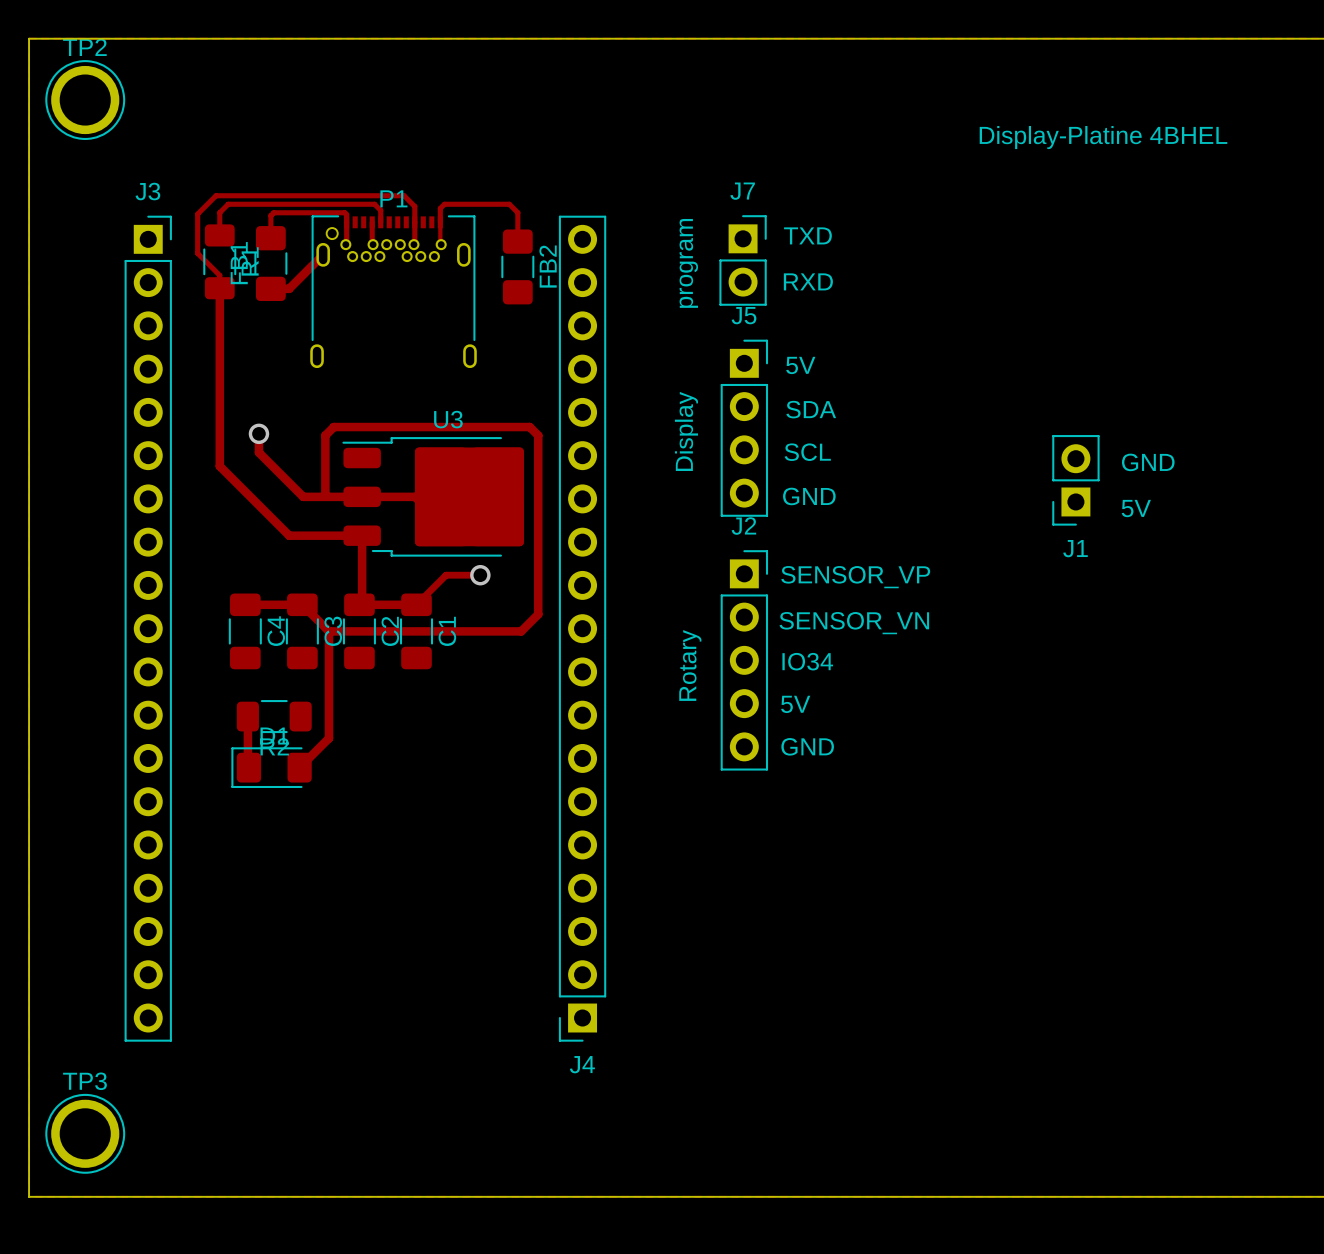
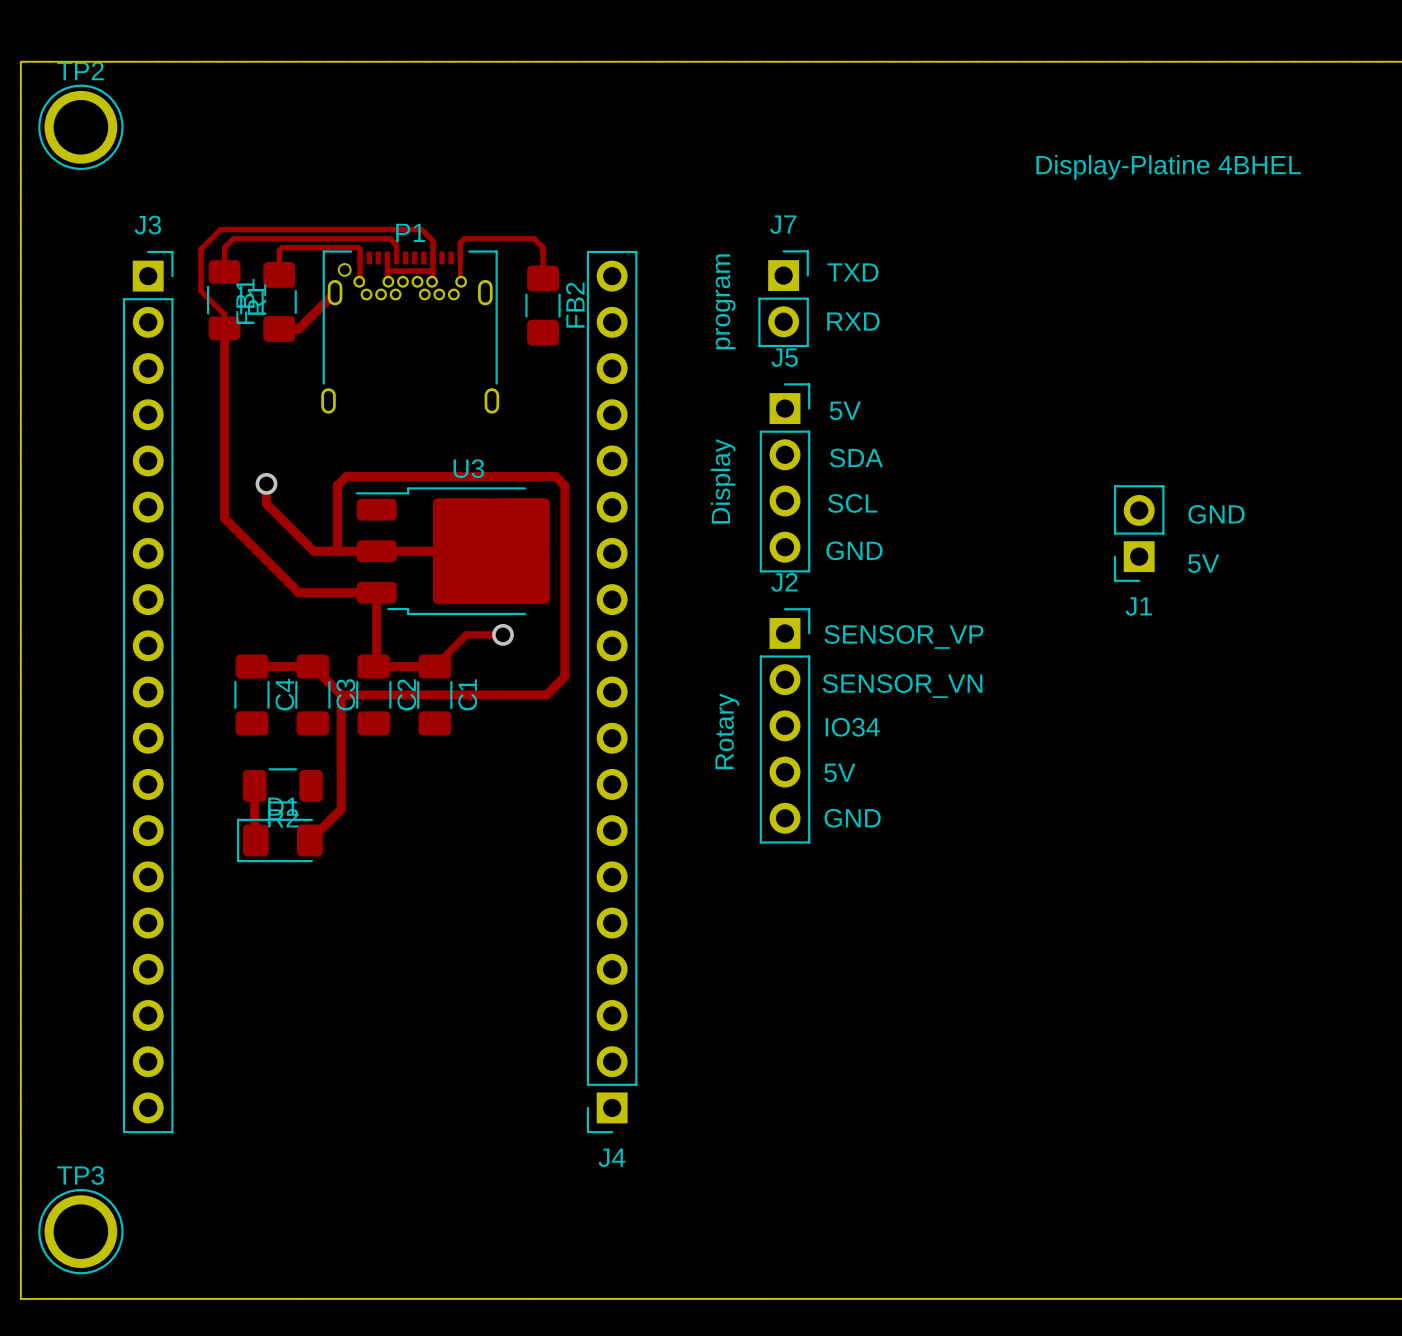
track: none -> (390, 270) (430, 270)

